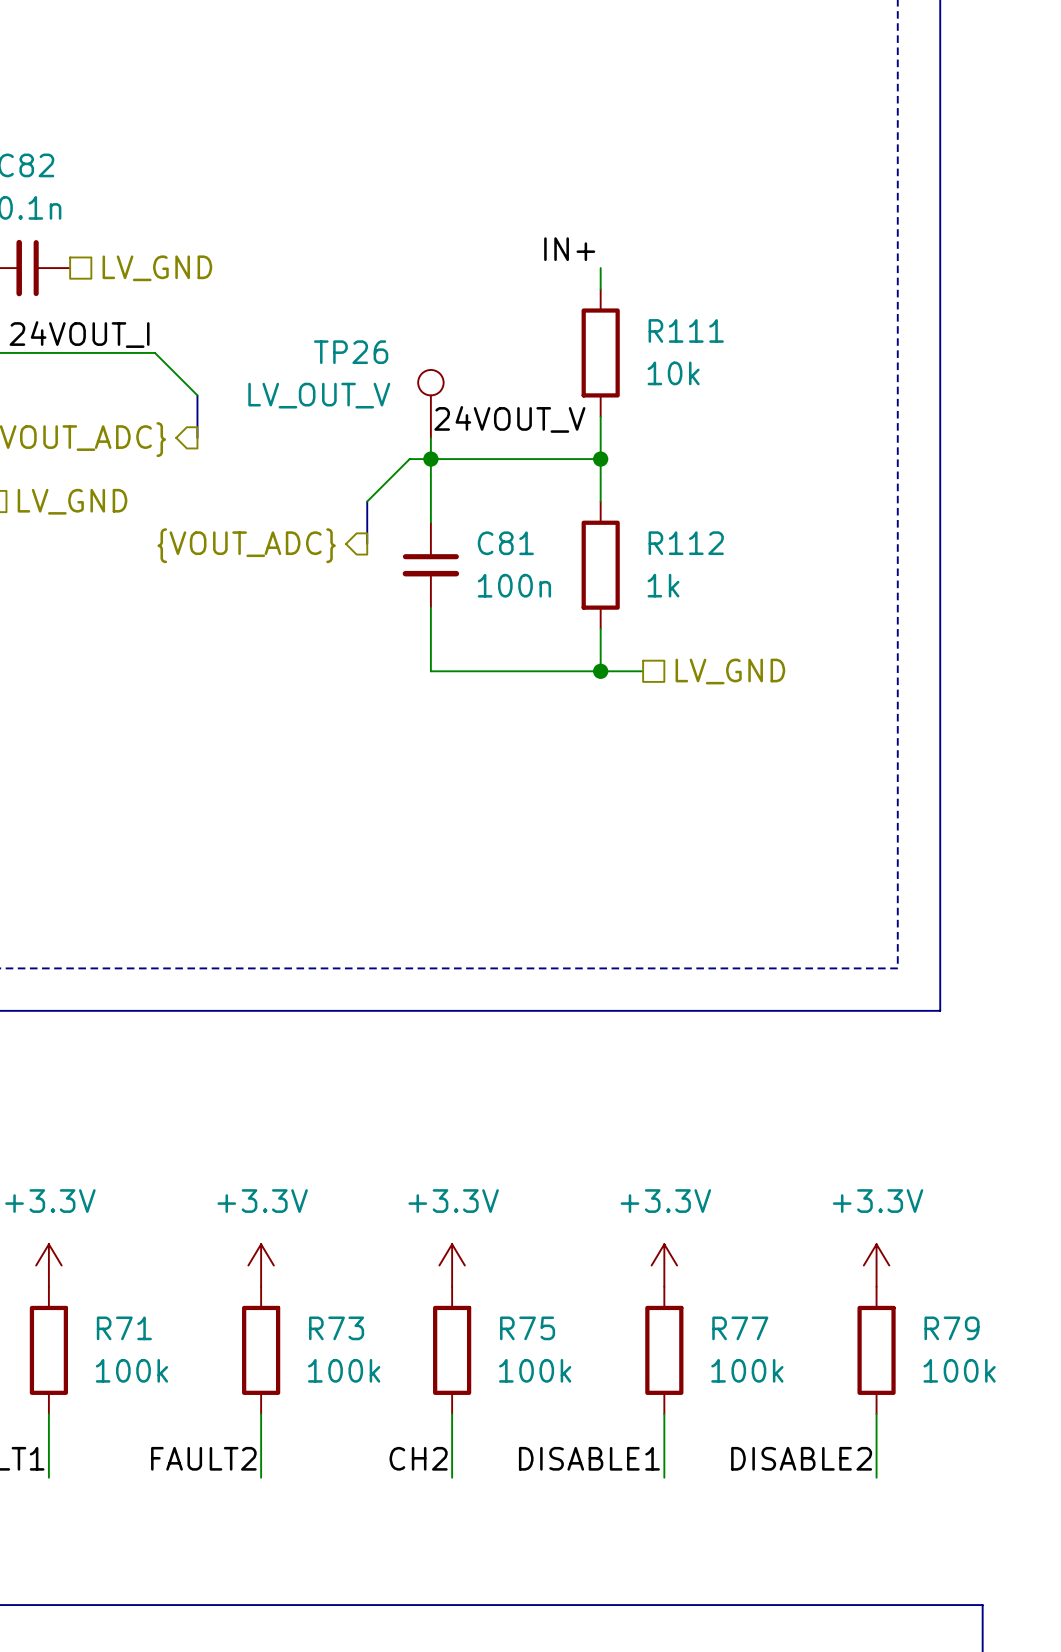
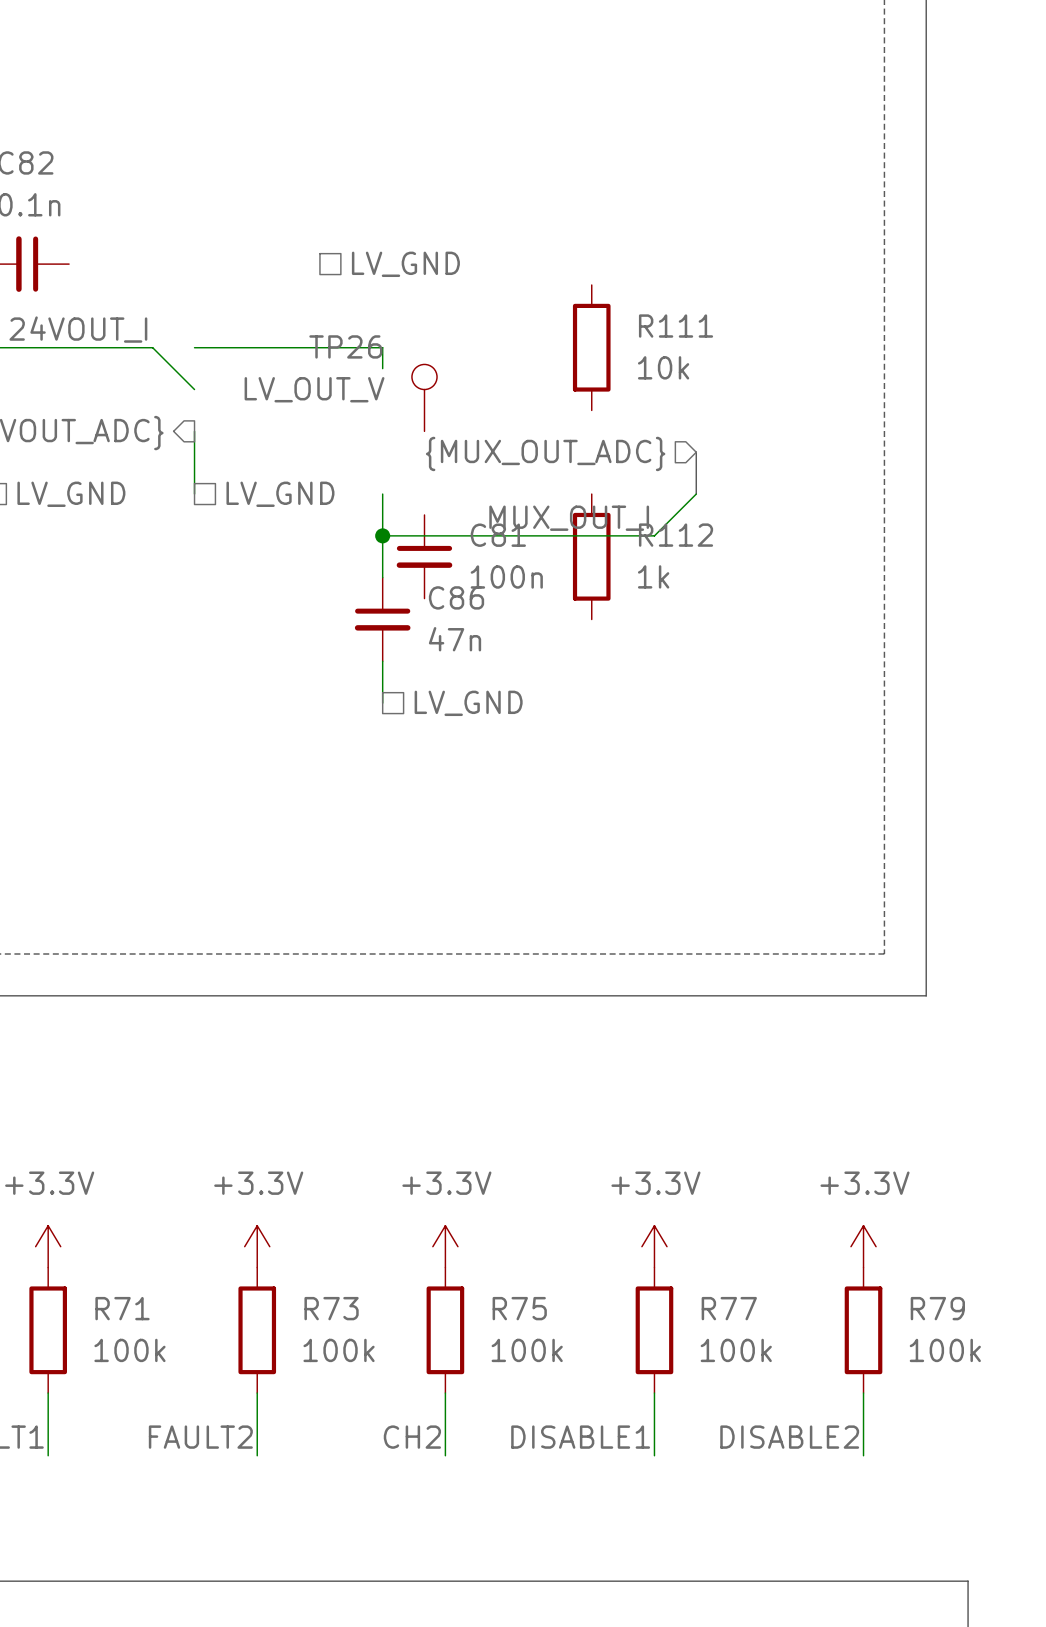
label: IN+ (569, 249) -> none
hierarchical label: LV_GND (157, 268) -> none
hierarchical label: none -> LV_GND (405, 264)
wire: (600, 268) (600, 289) -> none
wire: none -> (194, 347) (382, 347) (382, 368)
bus: (197, 395) (197, 437) -> none
wire: (600, 416) (600, 501) -> none
label: 24VOUT_V (509, 419) -> none
wire: none -> (194, 431) (194, 494)
wire: (430, 437) (430, 522) -> (382, 494) (382, 577)
junction position: (430, 459) -> (382, 535)
wire: (600, 459) (409, 459) (367, 501) -> none
junction: (600, 459) -> none
hierarchical label: none -> {MUX_OUT_ADC} (545, 453)
hierarchical label: none -> LV_GND (280, 494)
bus: (367, 501) (367, 543) -> (696, 452) (696, 494)
wire: none -> (696, 494) (654, 535) (382, 535)
label: none -> MUX_OUT_I (569, 518)
hierarchical label: {VOUT_ADC} (246, 545) -> none
wire: (430, 607) (430, 671) (643, 671) -> none
C86: none -> 47n (382, 619)
wire: (600, 628) (600, 671) -> (382, 661) (382, 703)
junction: (600, 671) -> none
hierarchical label: LV_GND (730, 671) -> none
hierarchical label: none -> LV_GND (468, 703)

